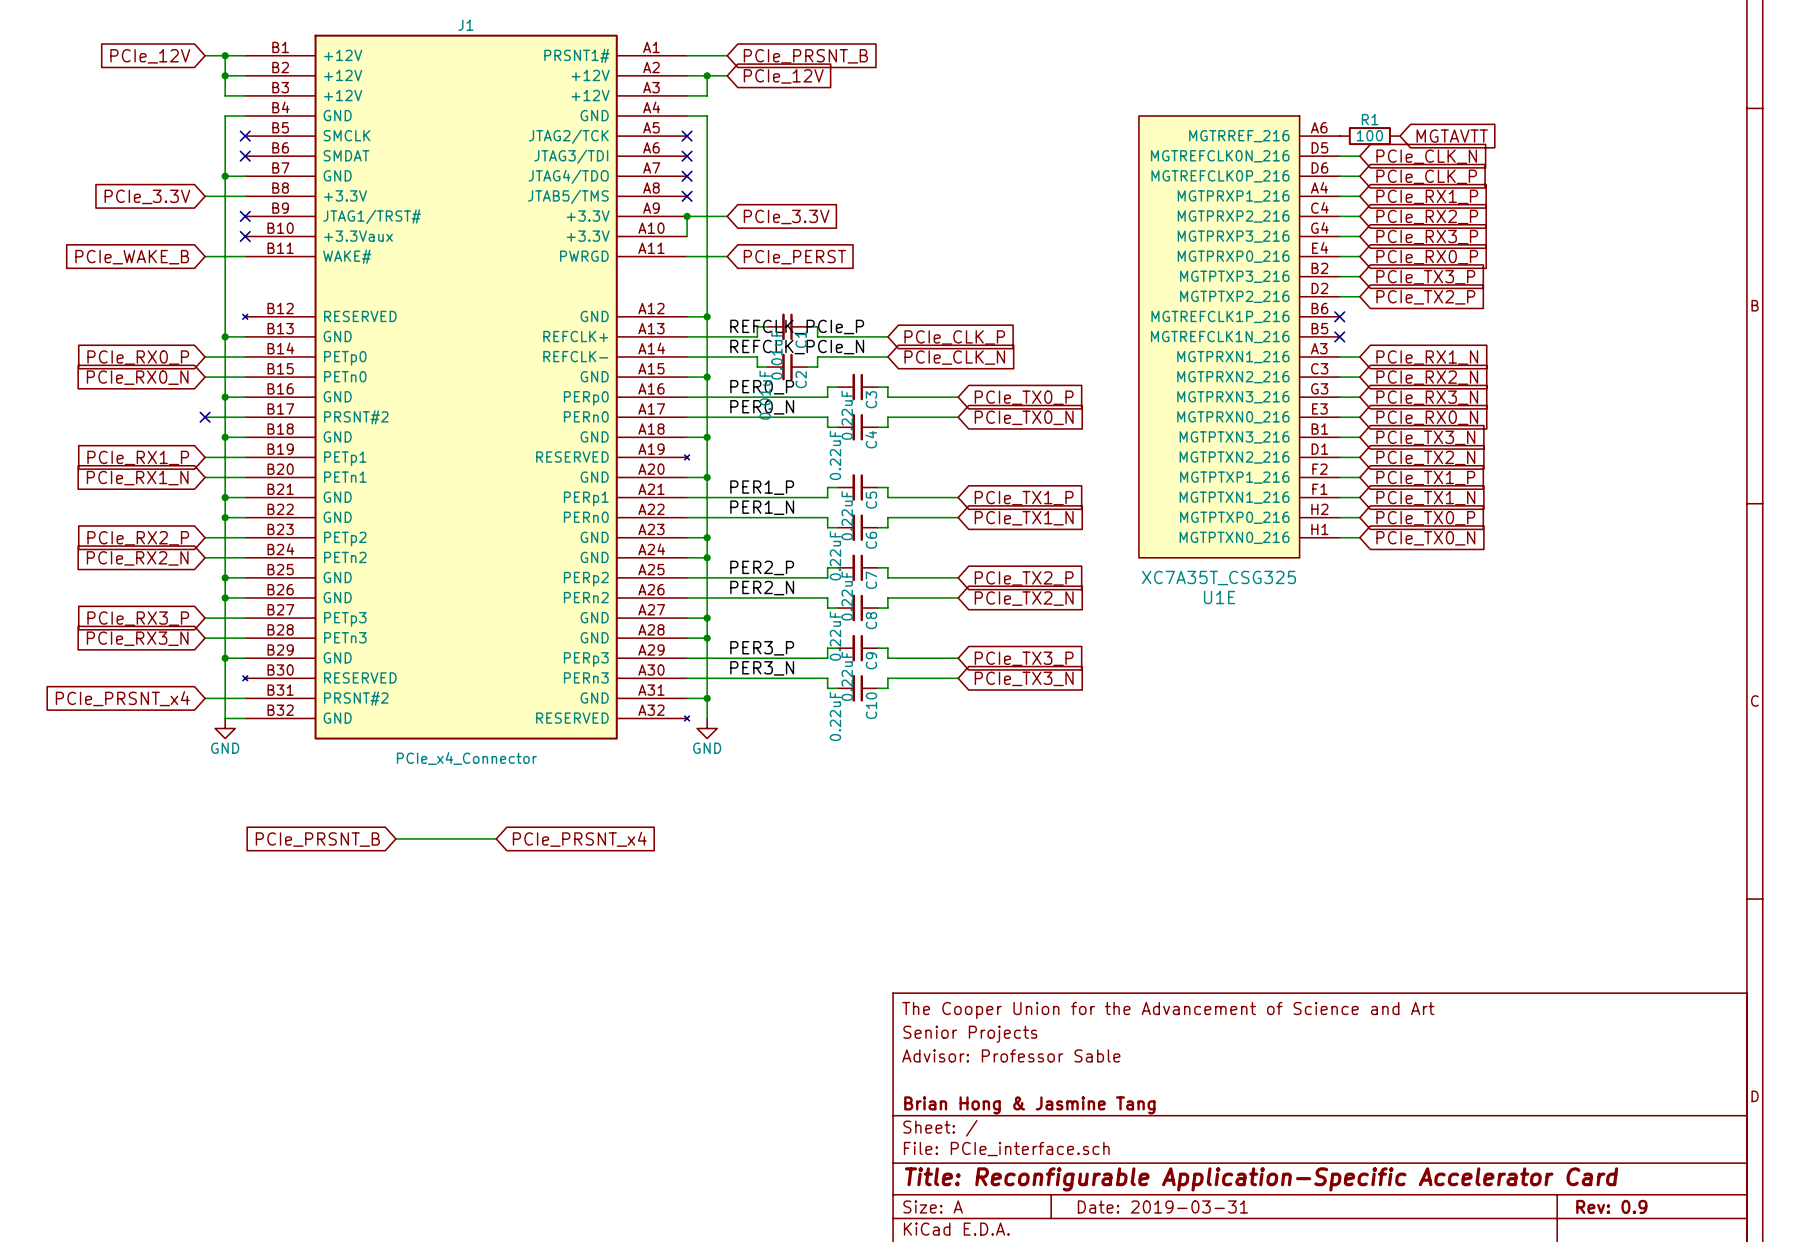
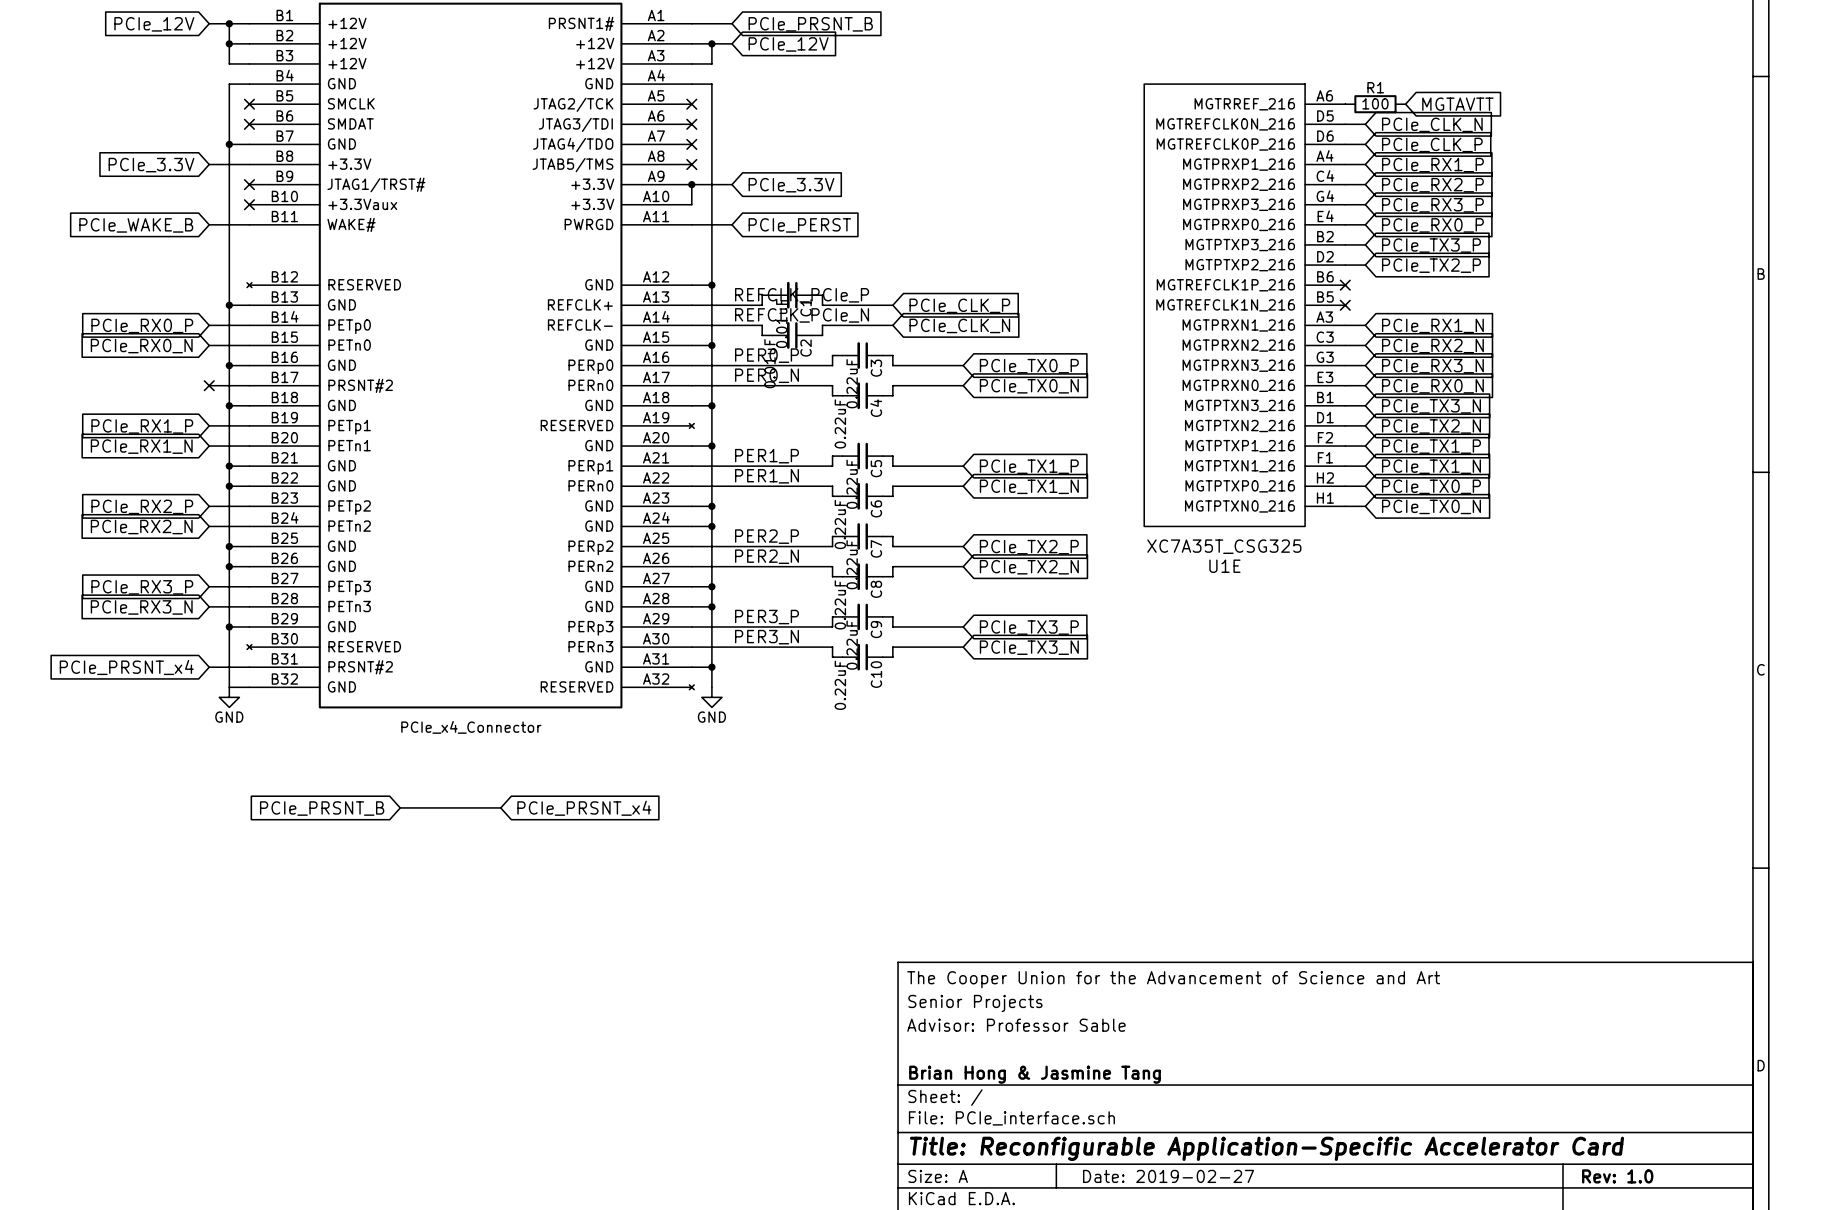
title block: Date: 2019-03-31 (1162, 1206) -> Date: 2019-02-27 (1168, 1176)
title block: Rev: 0.9 (1611, 1206) -> Rev: 1.0 (1617, 1176)

